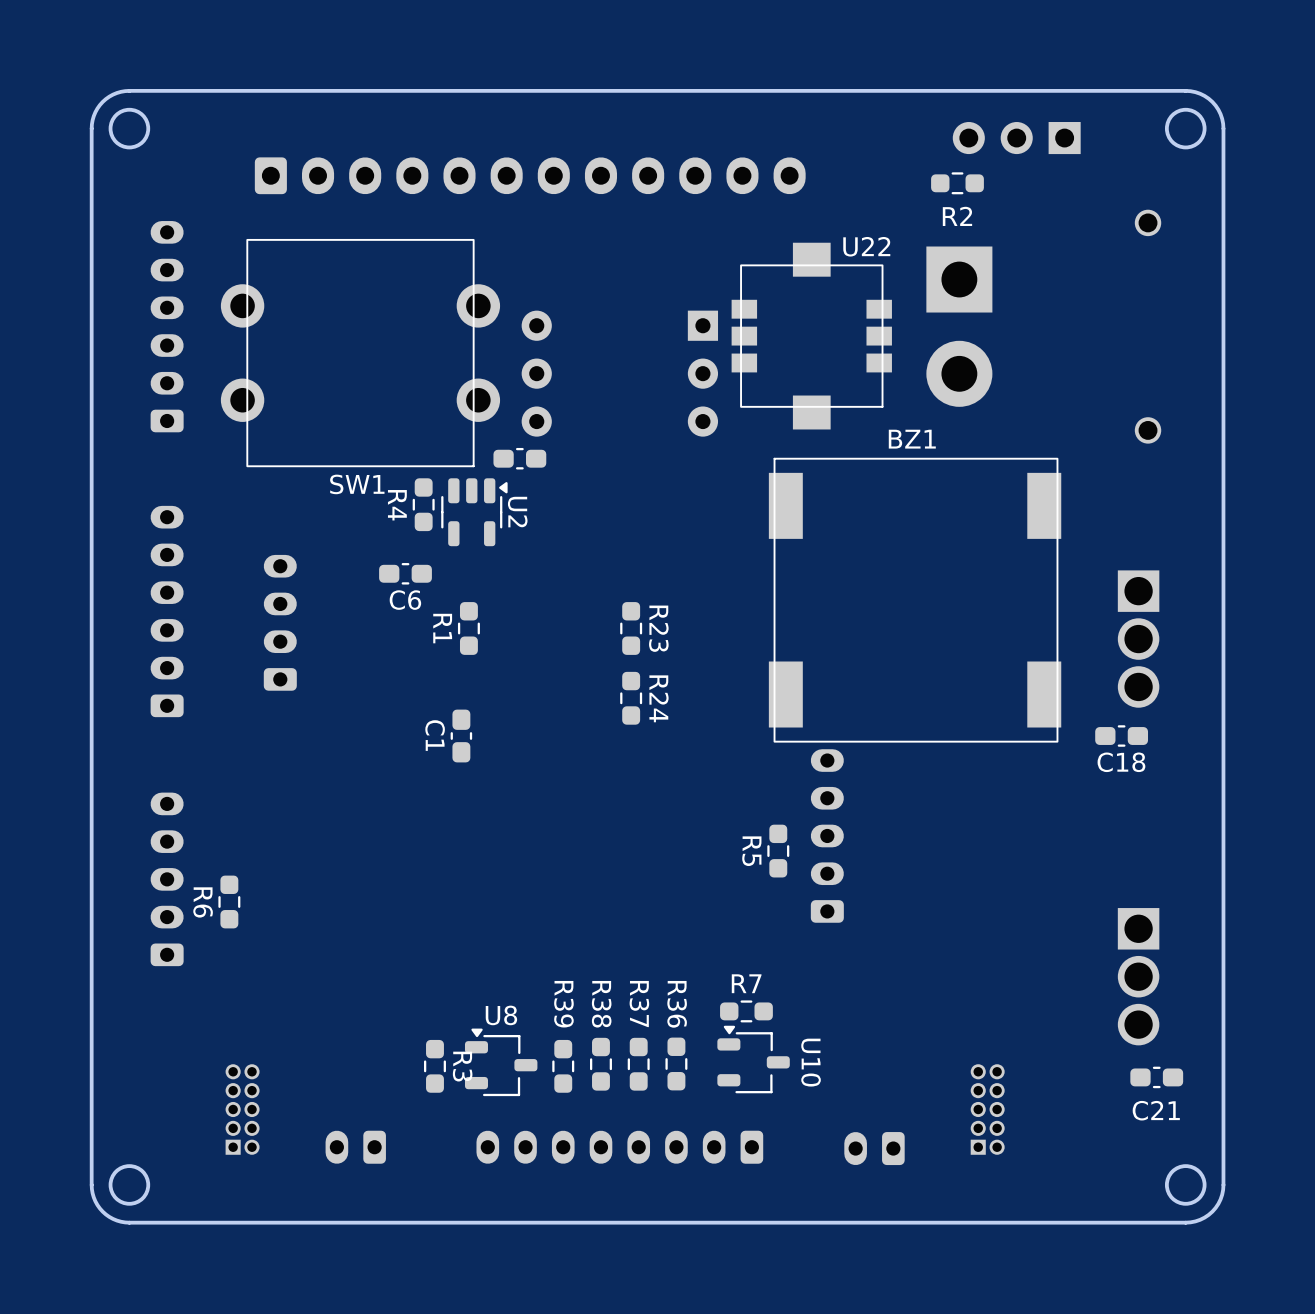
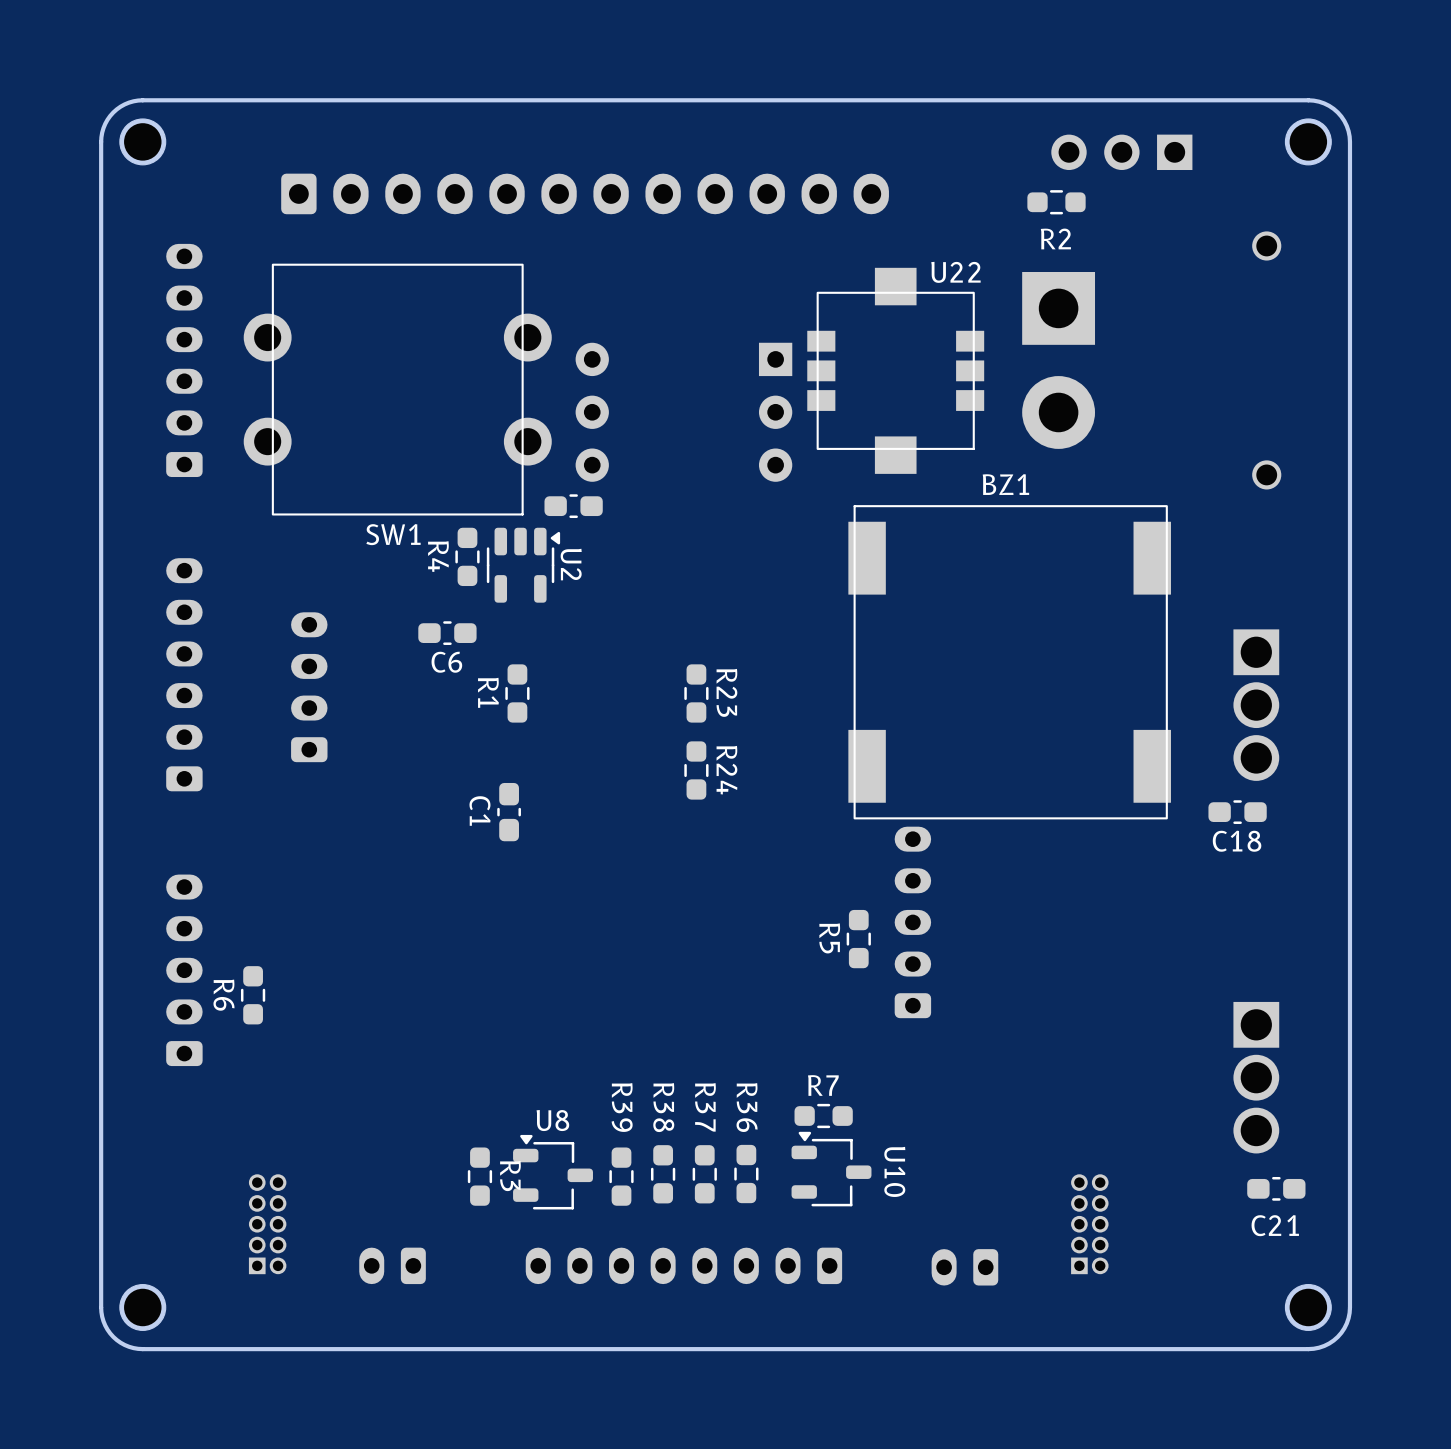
part: none -> (142, 141)
part: none -> (1308, 141)
part: none -> (142, 1307)
part: none -> (1308, 1307)

